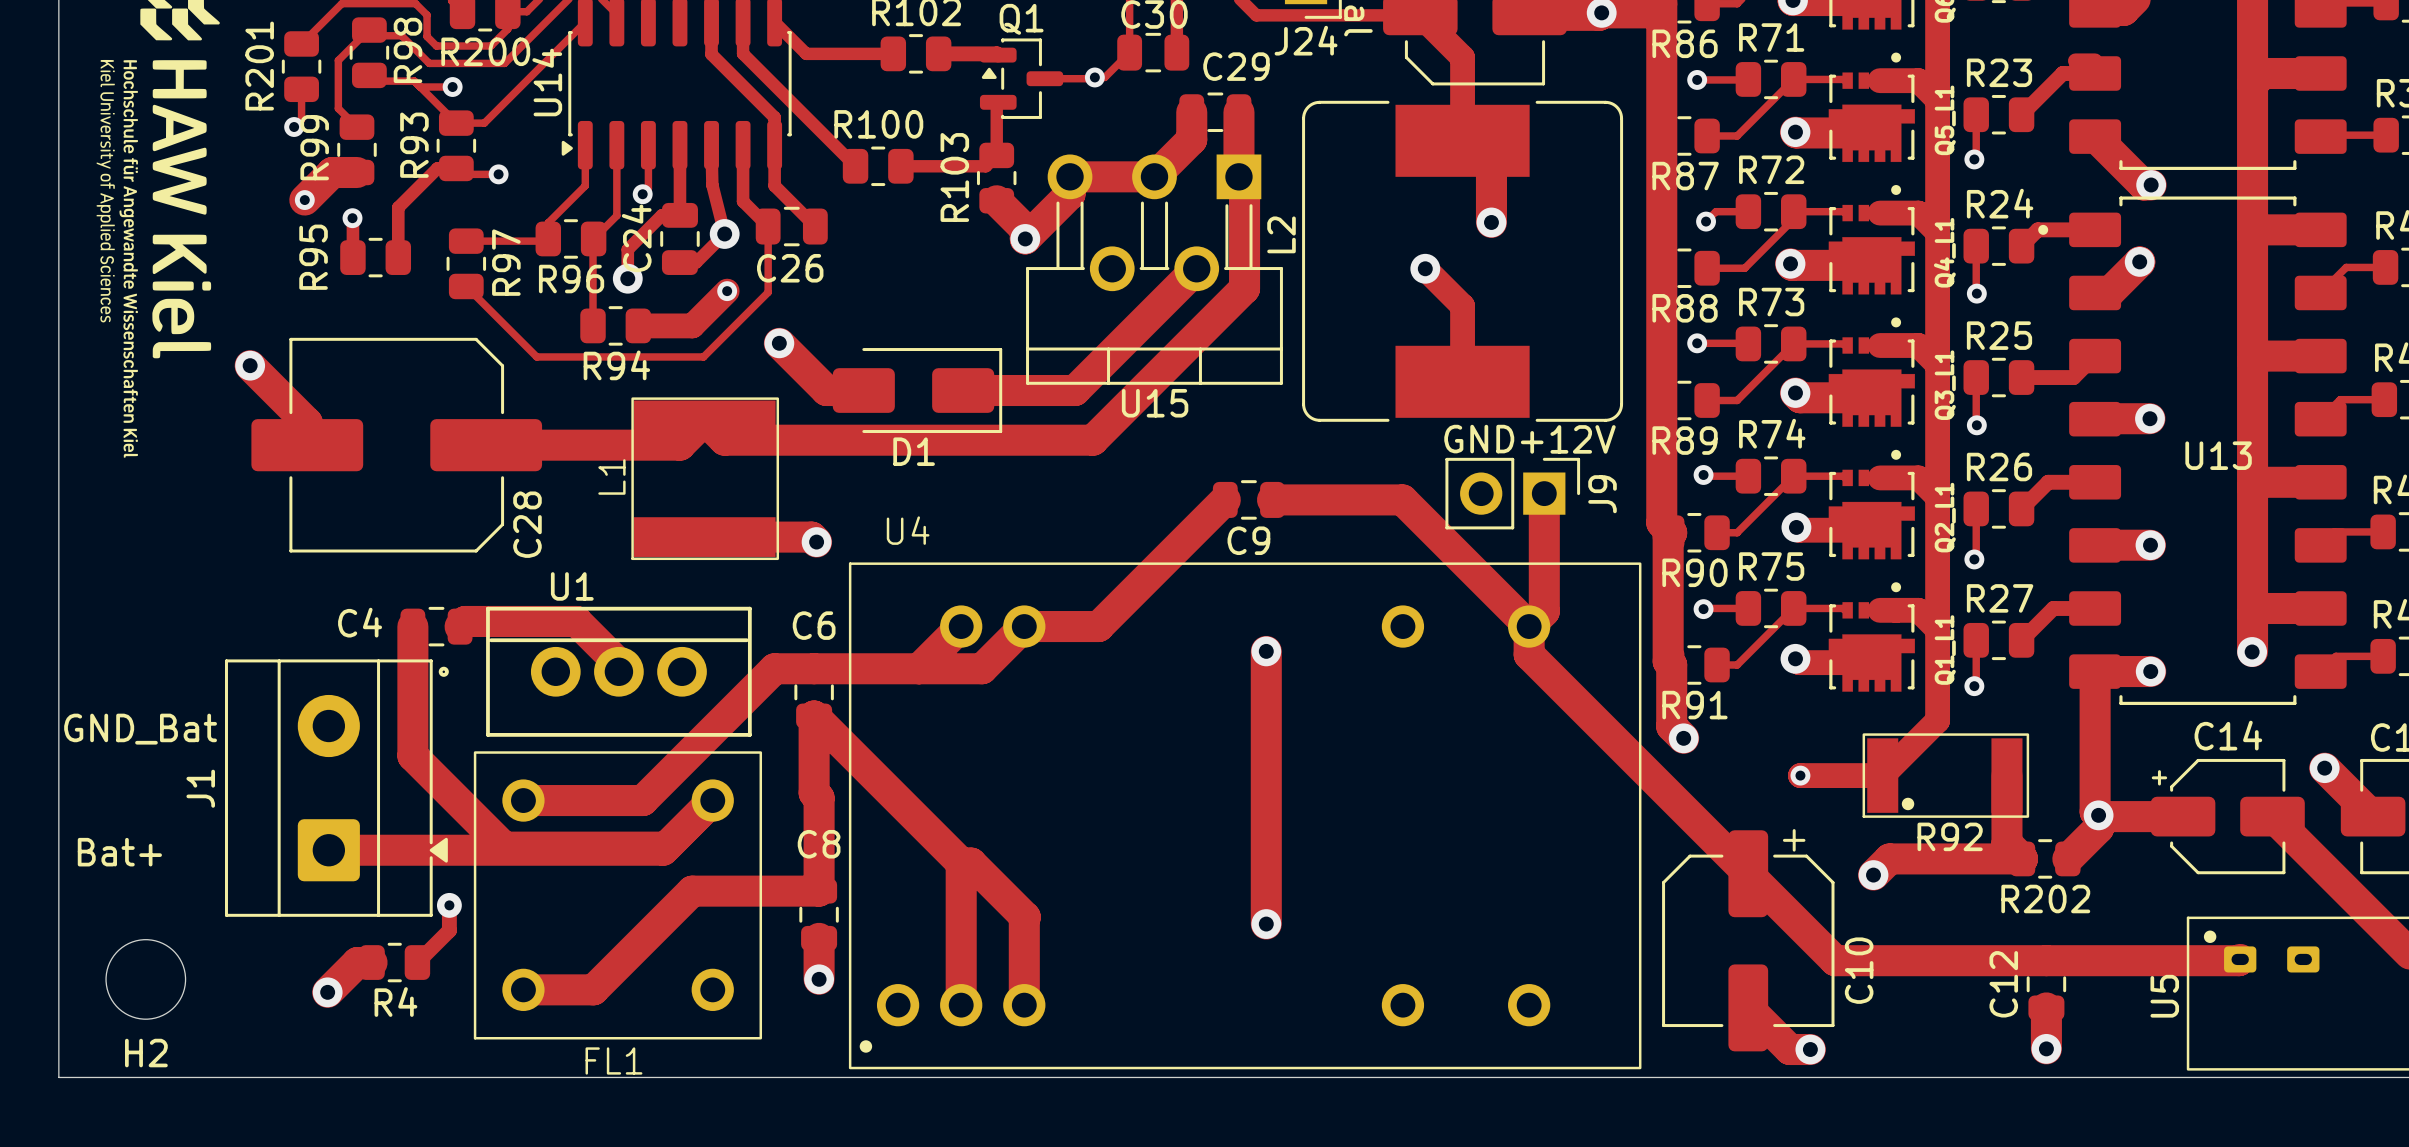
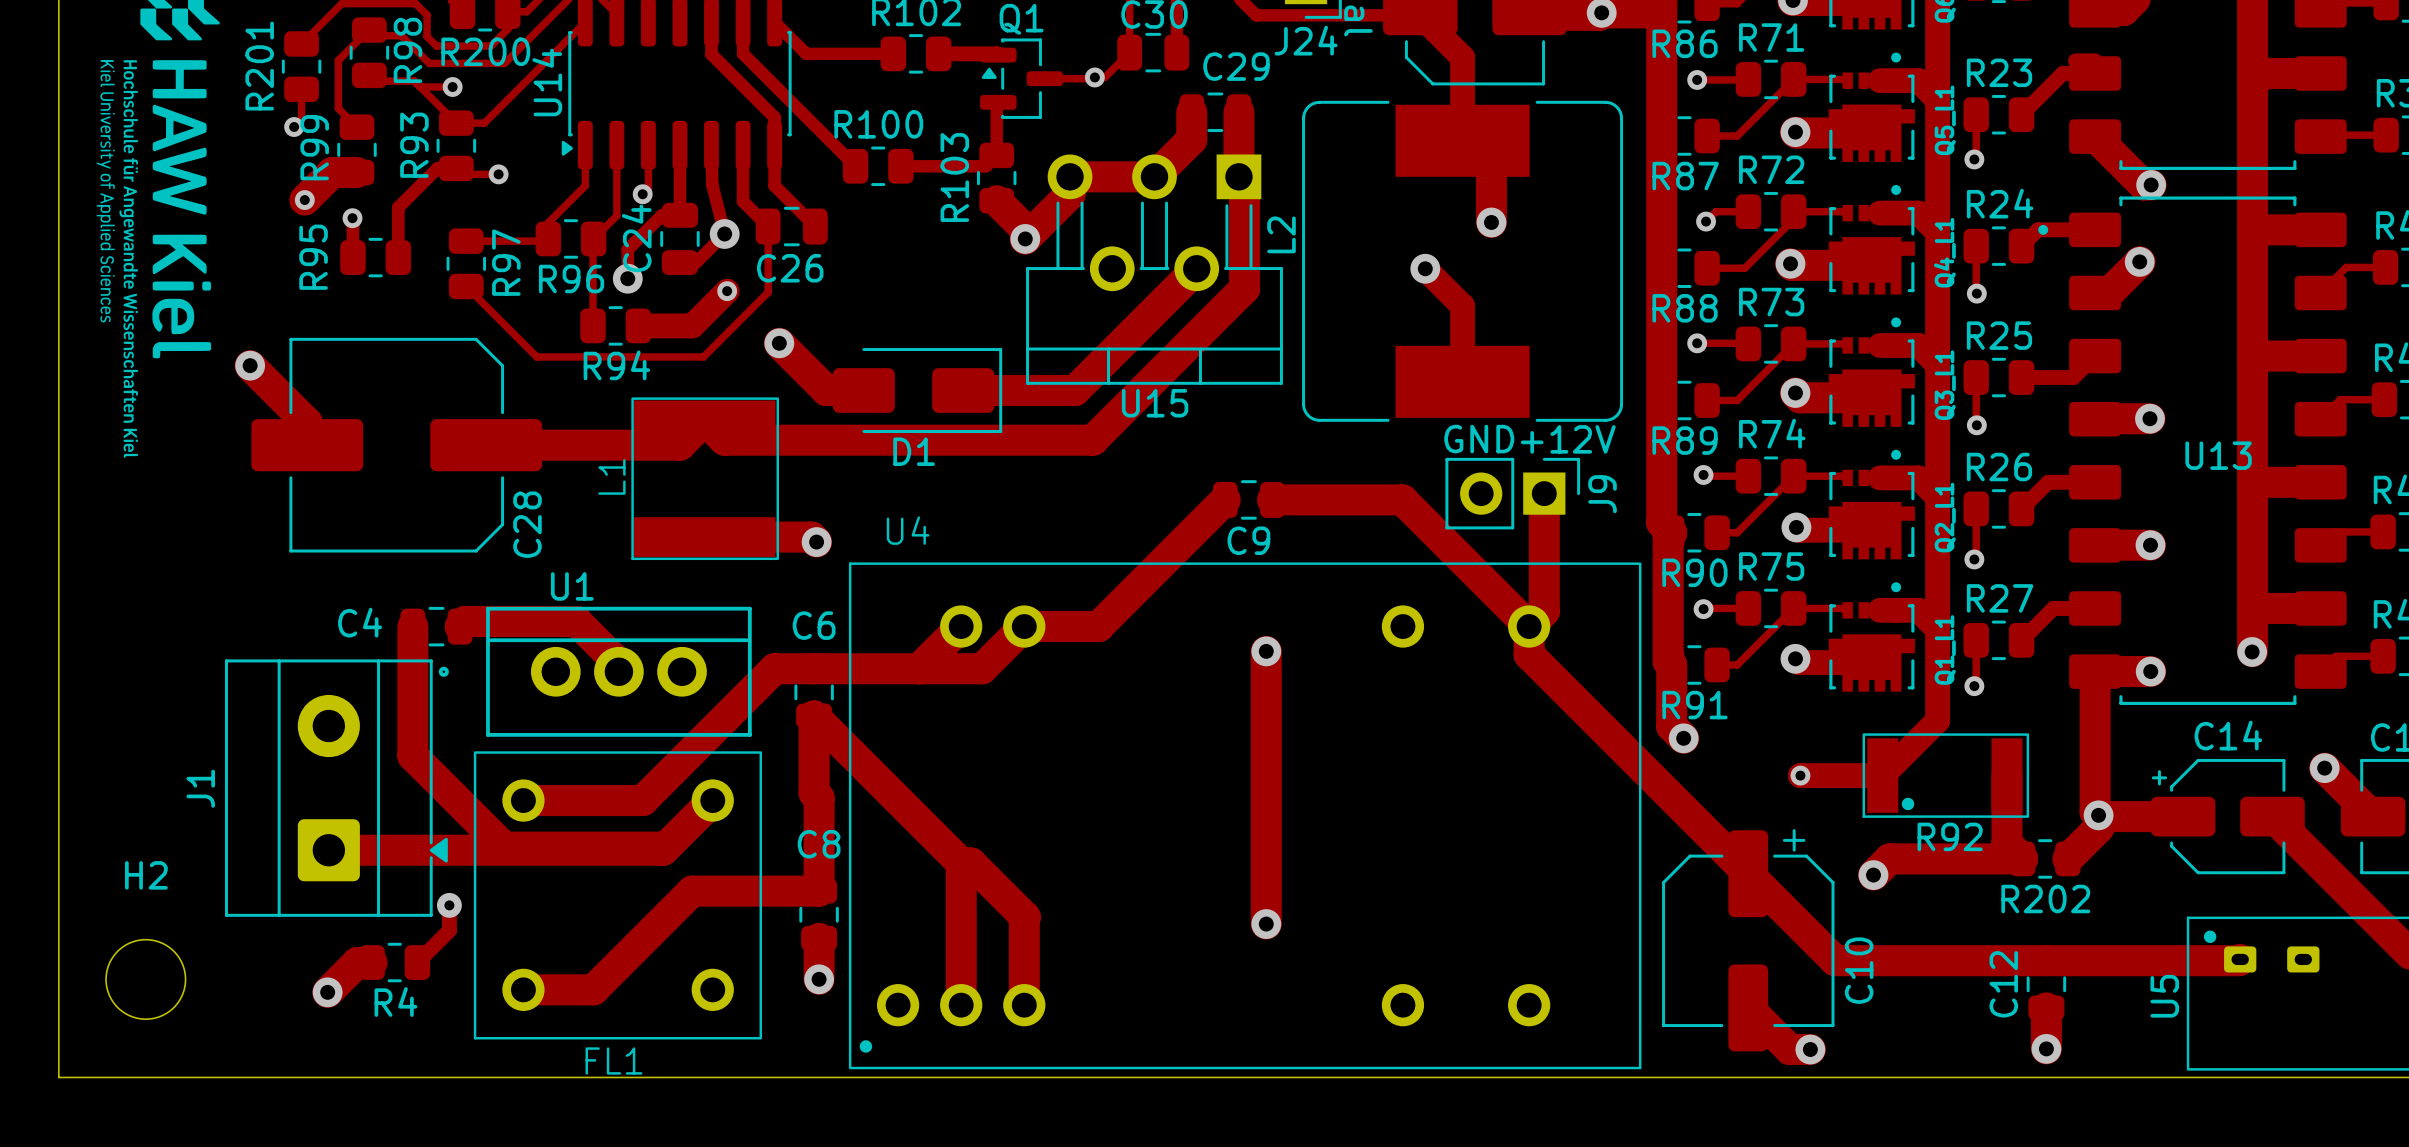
text: GND_Bat (140, 729) -> none
text: Bat+ (119, 852) -> none
H2 name position: H2 (146, 1053) -> H2 (146, 875)

